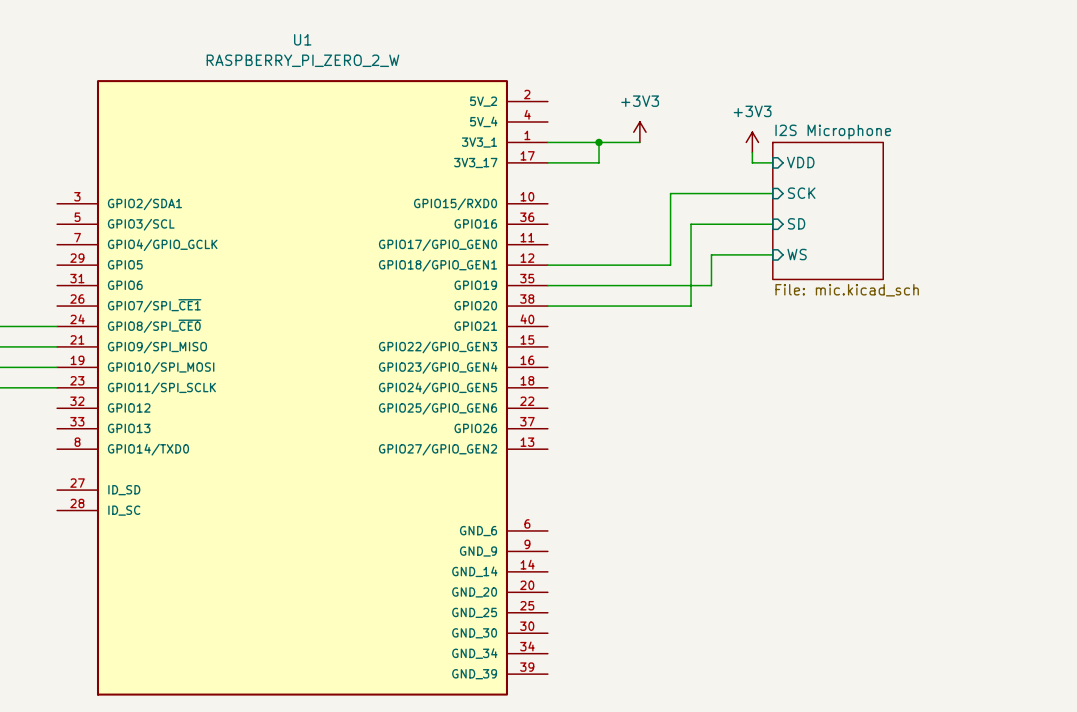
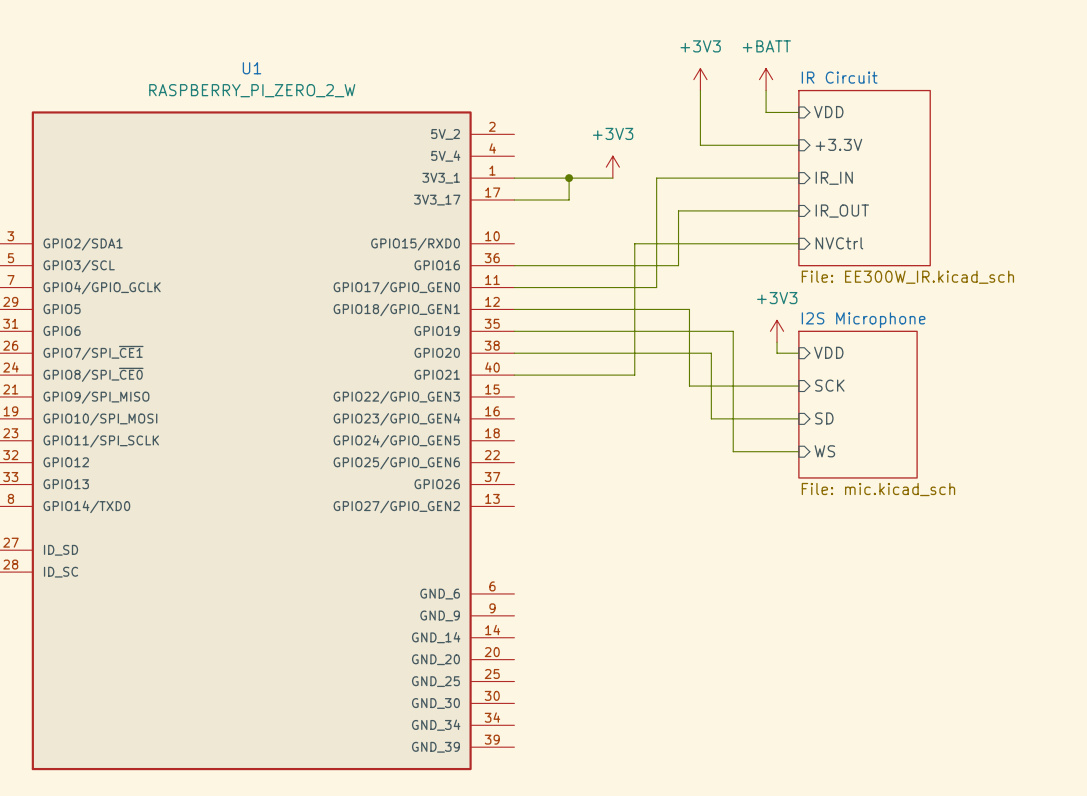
power symbol: none -> +3V3 (700, 79)
power symbol: none -> +BATT (766, 79)
wire: none -> (700, 90) (700, 145) (798, 145)
wire: none -> (766, 90) (766, 112) (798, 112)
sheet pin: none -> VDD (828, 112)
sheet pin: none -> +3.3V (838, 144)
power symbol: +3V3 (752, 142) -> none
wire: none -> (798, 178) (656, 178) (656, 287) (514, 287)
sheet pin: none -> IR_IN (834, 178)
sheet IR Circuit: none -> File: EE300W_IR.kicad_sch (864, 178)
wire: (752, 152) (752, 162) (772, 162) -> (777, 342) (777, 353) (798, 353)
sheet pin: VDD (800, 162) -> none
sheet pin: none -> IR_OUT (842, 211)
wire: (772, 193) (670, 193) (670, 265) -> (689, 309) (645, 309)
sheet pin position: SCK (801, 193) -> SCK (829, 385)
wire: none -> (798, 243) (634, 243) (634, 375) (514, 375)
sheet pin: none -> NVCtrl (839, 243)
sheet I2S Microphone position: (828, 210) -> (858, 404)
sheet pin position: SD (796, 223) -> SD (824, 418)
wire: (691, 224) (691, 306) -> (667, 265) (514, 265)
wire: (701, 224) (772, 224) -> (678, 265) (678, 210) (798, 210)
wire: (772, 254) (711, 254) (711, 265) -> none
sheet pin position: WS (797, 254) -> WS (824, 451)
power symbol: none -> +3V3 (777, 331)
sheet pin: none -> VDD (828, 352)
wire: none -> (667, 353) (711, 353) (711, 418) (798, 418)
wire: none -> (798, 386) (689, 386) (689, 331) (733, 331) (733, 451) (798, 451)

